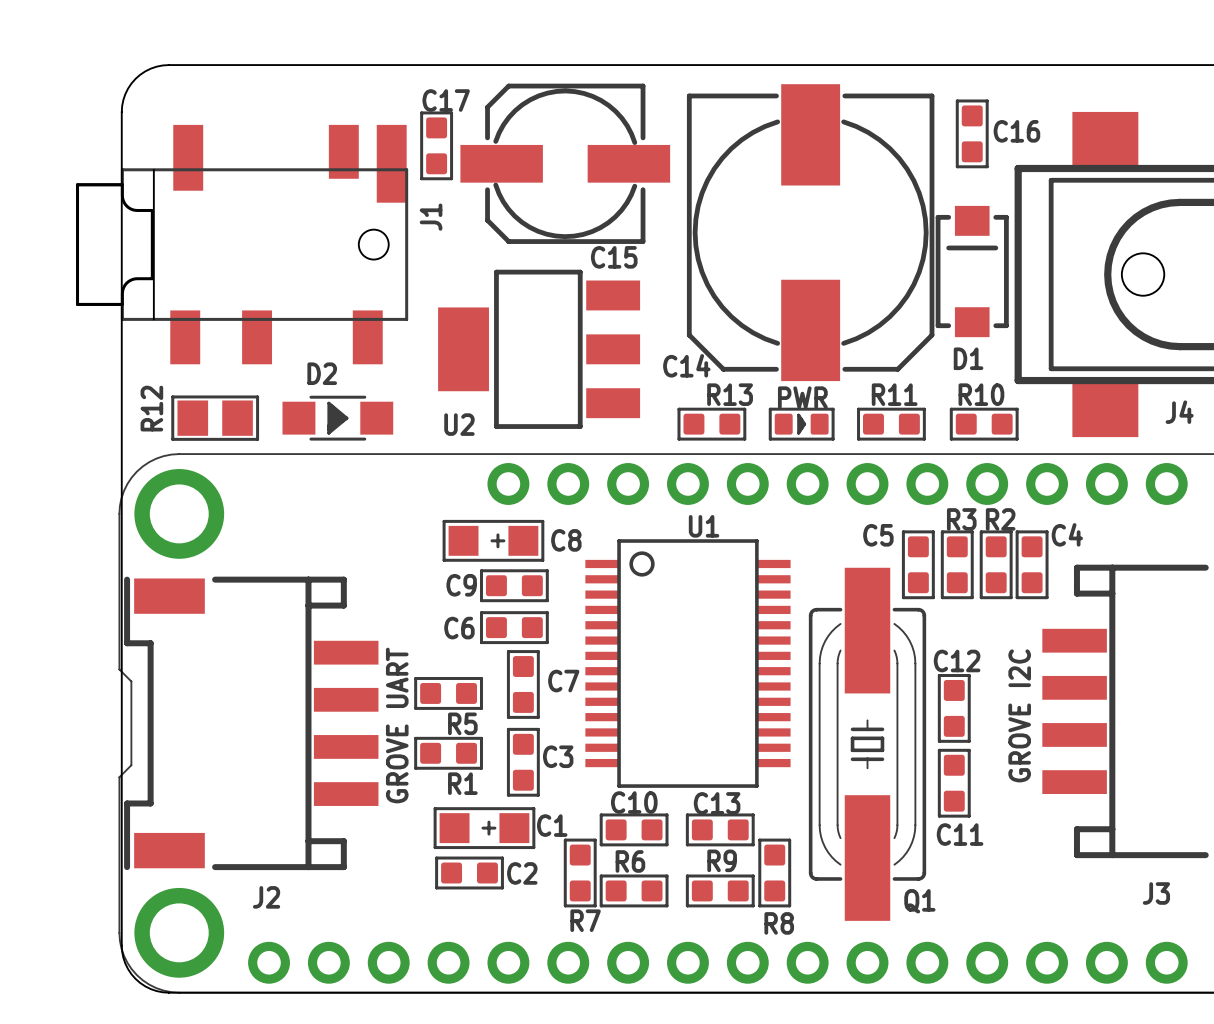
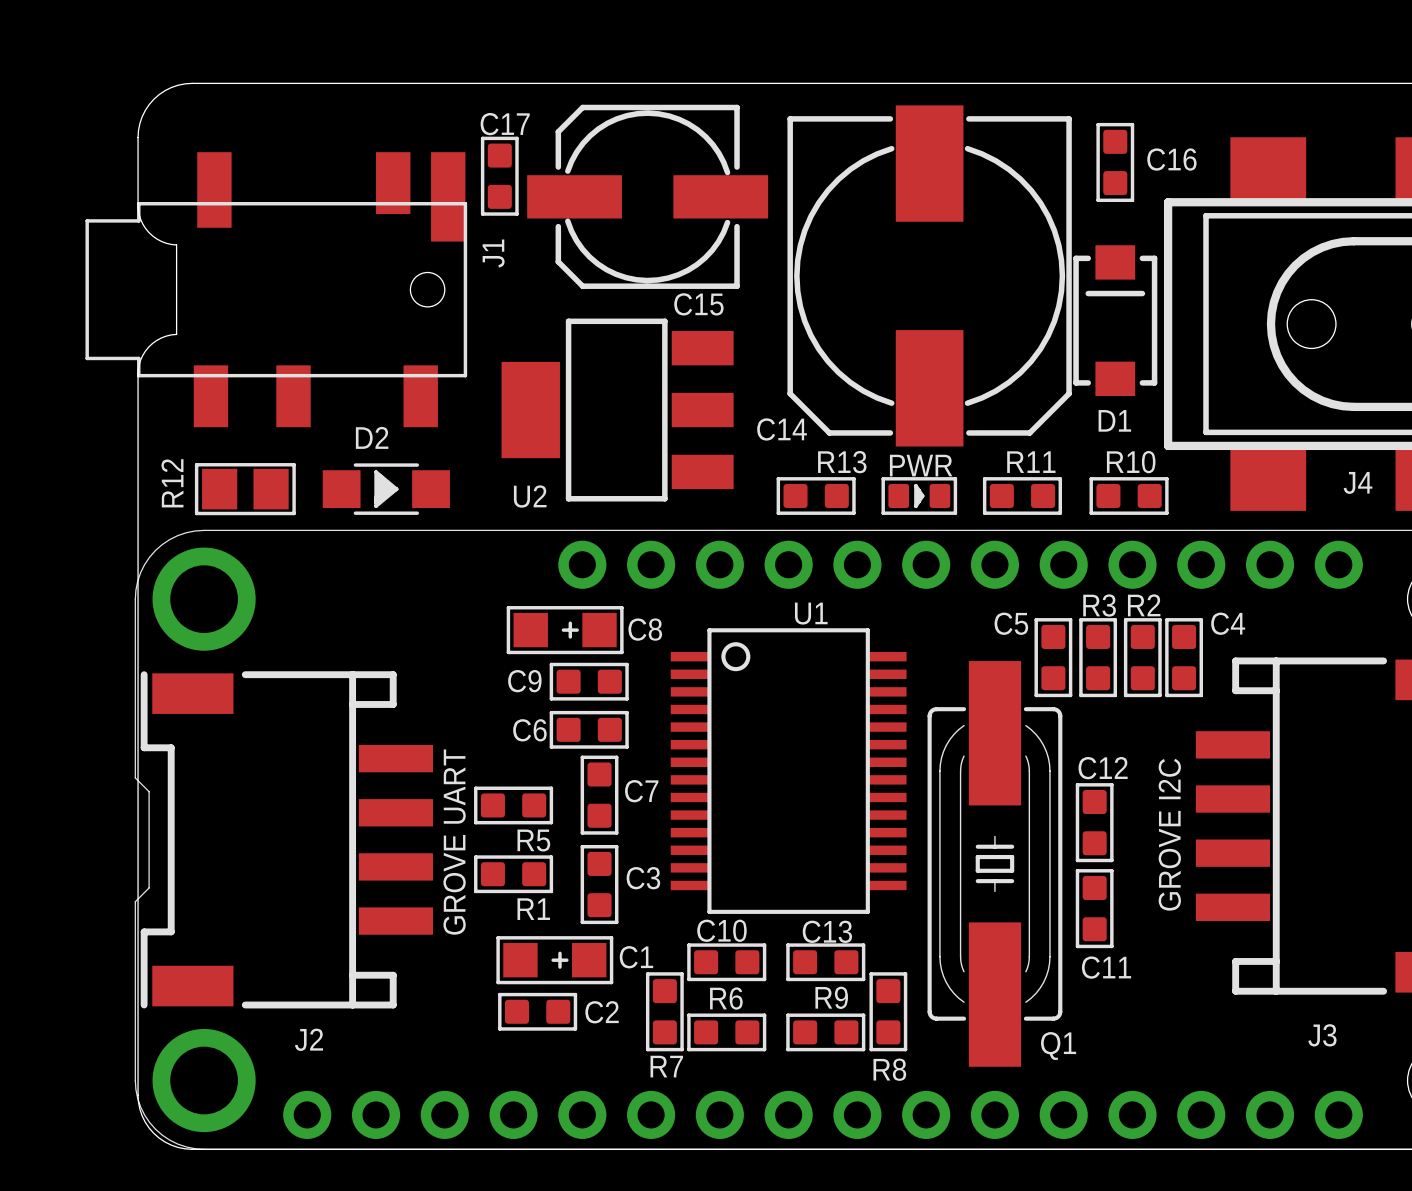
J1 footprint: [76, 124, 409, 365] -> [85, 152, 468, 428]
board edge: (121, 169) (121, 319) -> (138, 203) (140, 219) (148, 232) (161, 241) (176, 244) (176, 334) (161, 337) (148, 347) (140, 360) (138, 375)

